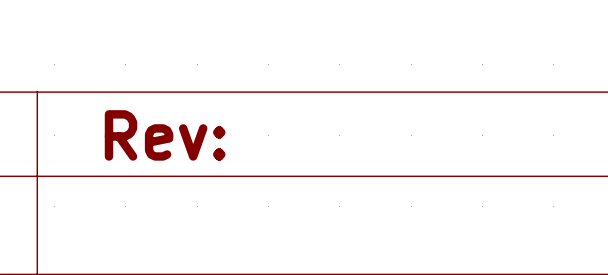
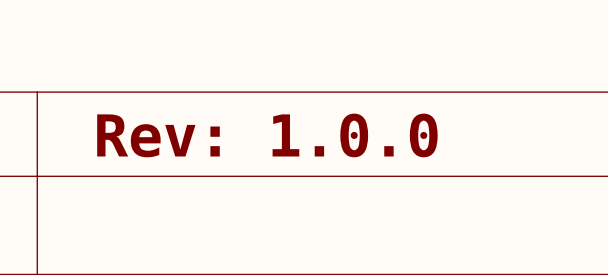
title block: Rev: (165, 135) -> Rev: 1.0.0 (267, 135)

